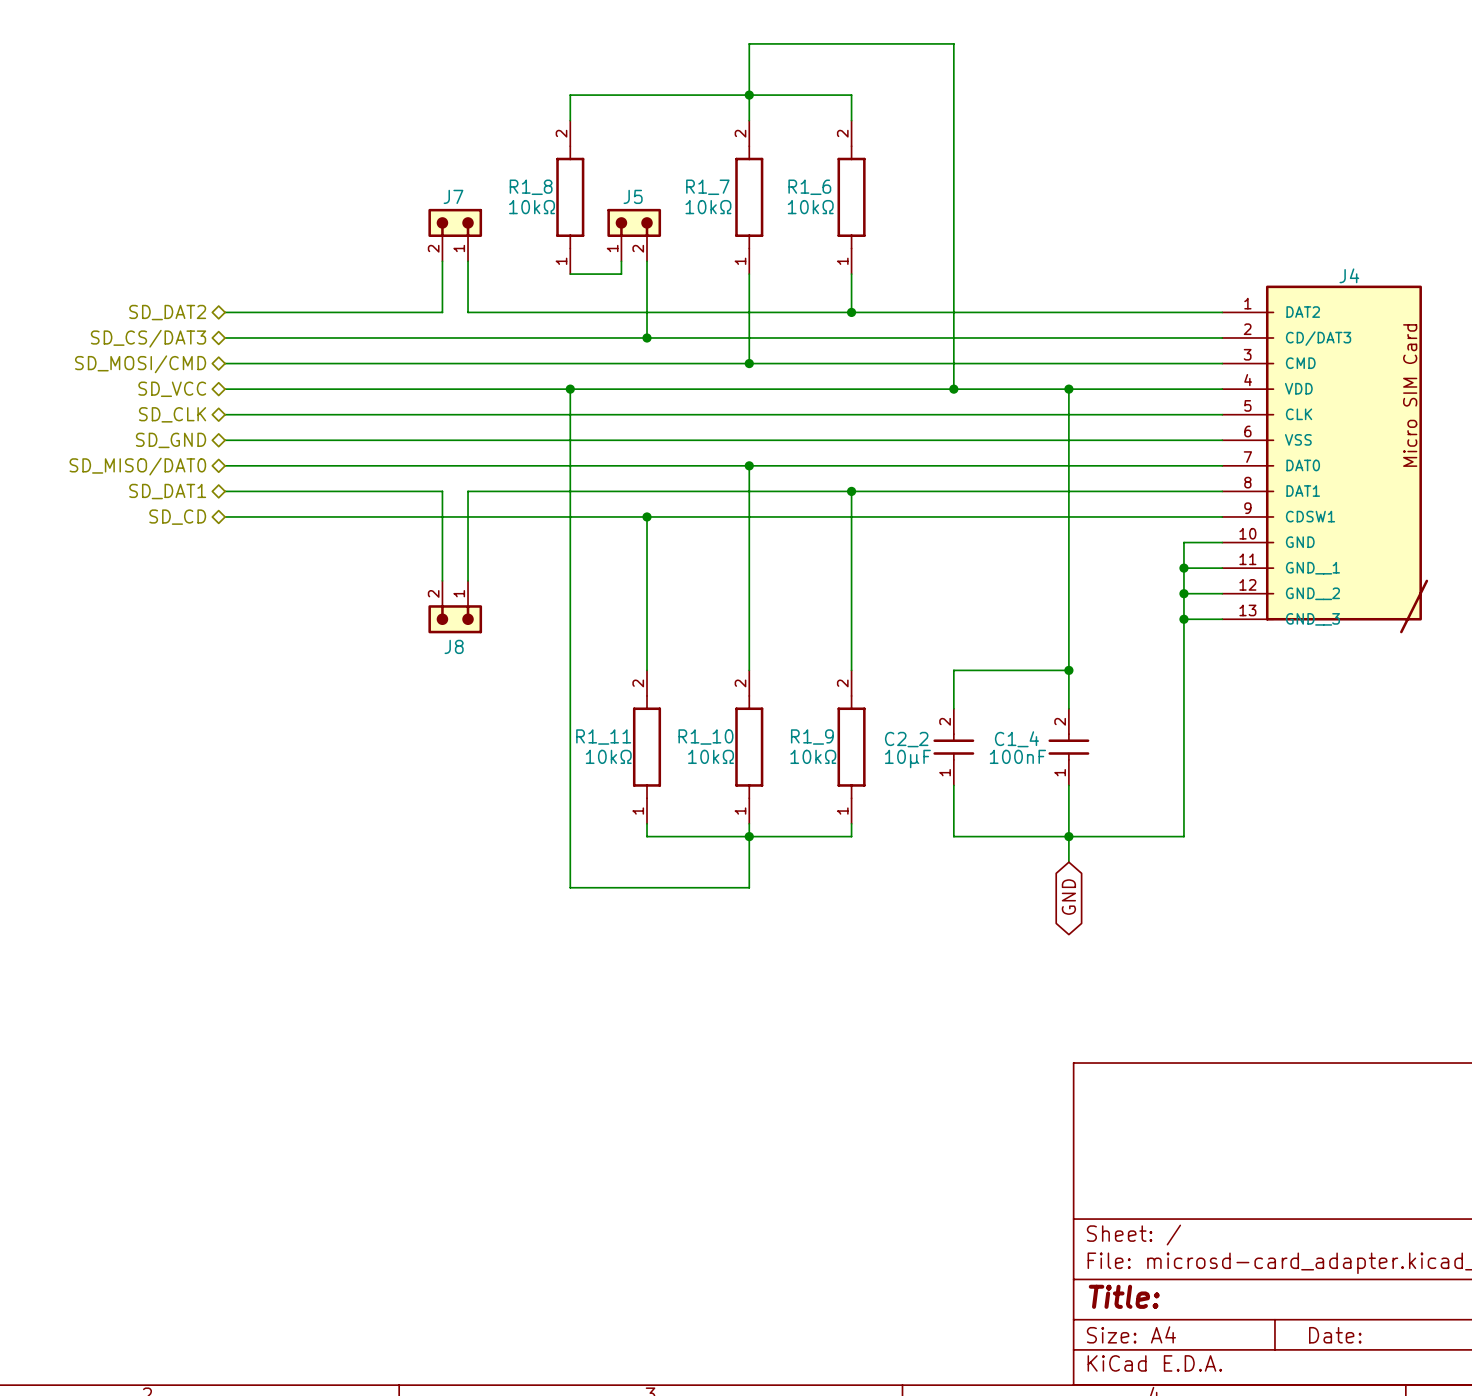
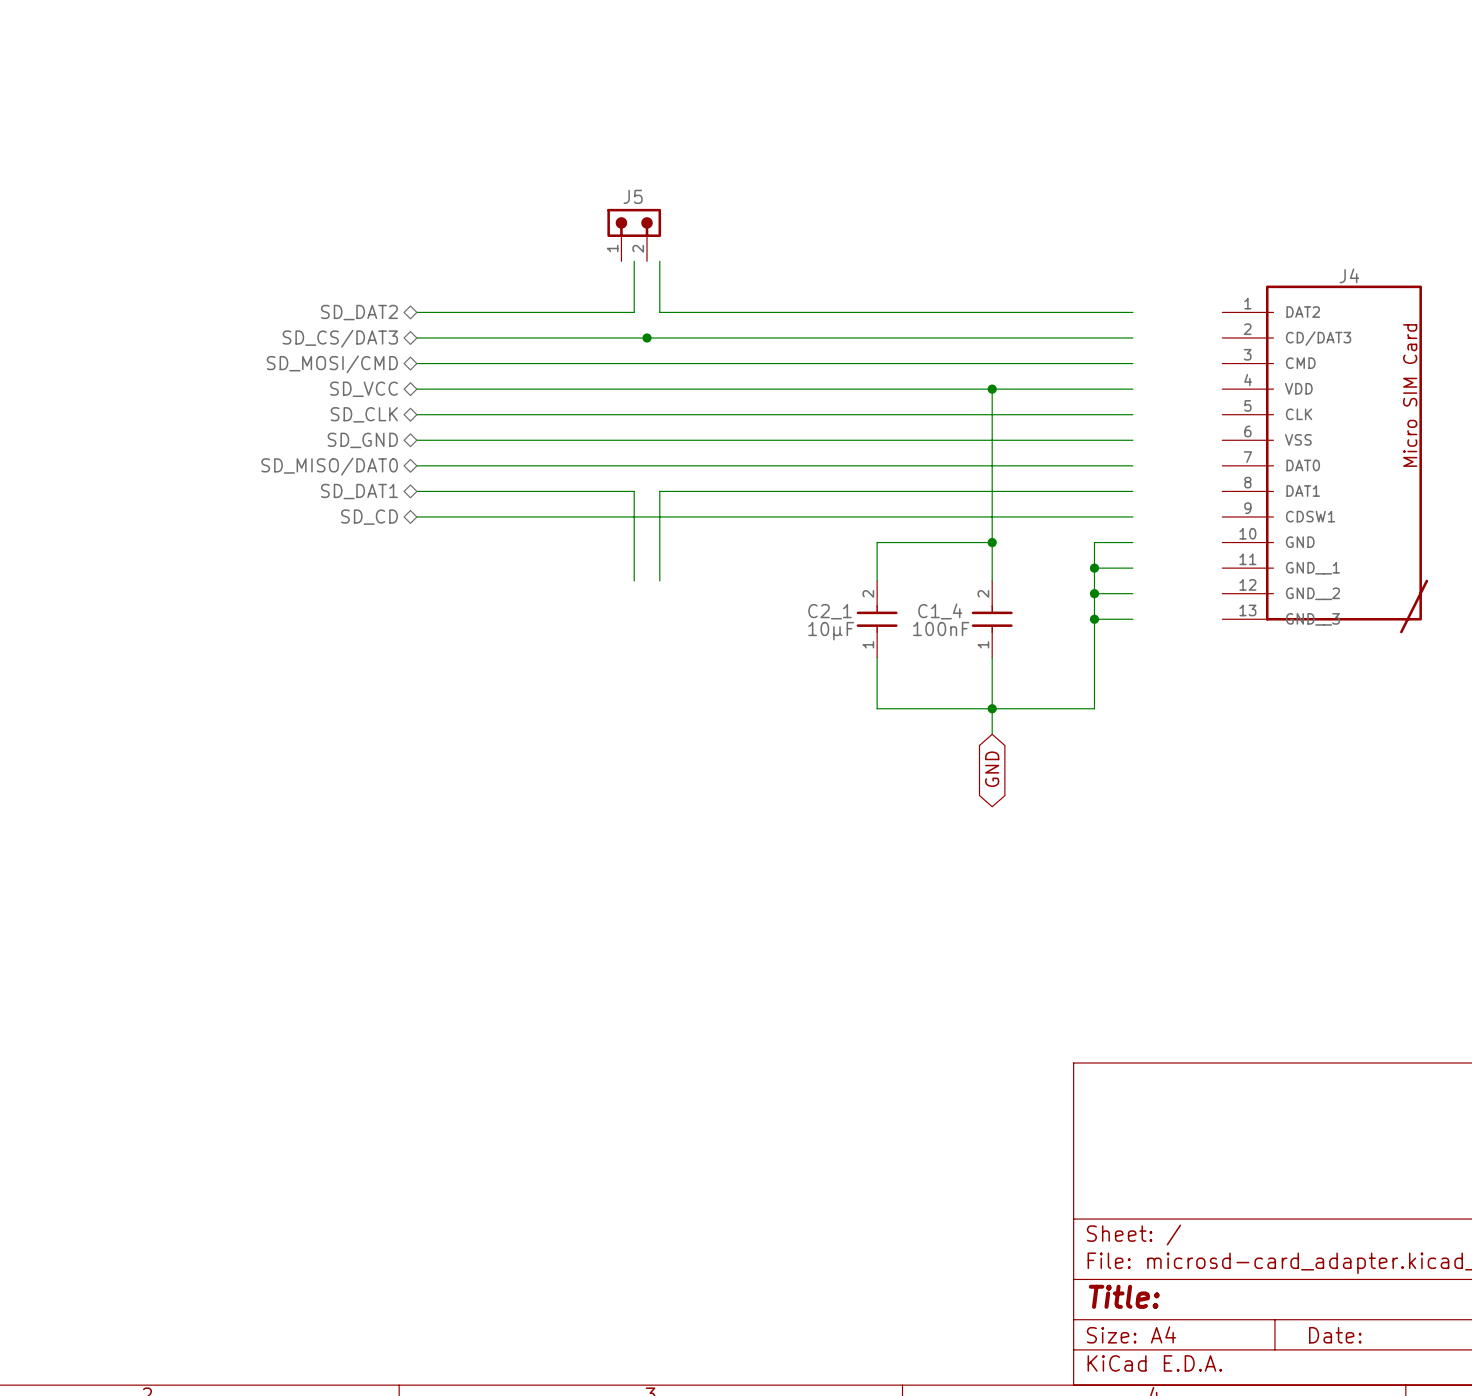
junction: (749, 95) -> none
wire: (570, 120) (570, 95) (851, 95) (851, 120) -> none
wire: (749, 120) (749, 43) (953, 43) (953, 389) -> none
R1_8: 10kΩ (570, 197) -> none
R1_7: 10kΩ (749, 197) -> none
R1_6: 10kΩ (851, 197) -> none
J7: (455, 235) -> none
wire: (442, 261) (442, 312) -> (468, 312) (442, 312)
wire: (468, 261) (468, 312) -> (659, 261) (659, 312)
wire: (621, 261) (621, 274) (570, 274) -> none
wire: (647, 261) (647, 337) -> none
wire: (749, 274) (749, 363) -> none
wire: (851, 274) (851, 312) -> none
hierarchical label position: SD_DAT2 (167, 312) -> SD_DAT2 (359, 312)
wire: (225, 312) (416, 312) -> none
wire: (634, 312) (659, 312) -> (634, 312) (634, 261)
junction: (851, 312) -> none
wire: (1132, 312) (1222, 312) -> none
wire: (225, 337) (416, 337) -> none
wire: (1132, 337) (1222, 337) -> none
hierarchical label position: SD_CS/DAT3 (148, 338) -> SD_CS/DAT3 (340, 338)
wire: (225, 363) (416, 363) -> none
junction: (749, 363) -> none
wire: (1132, 363) (1222, 363) -> none
hierarchical label position: SD_MOSI/CMD (140, 364) -> SD_MOSI/CMD (332, 364)
hierarchical label position: SD_VCC (172, 389) -> SD_VCC (364, 389)
wire: (225, 389) (416, 389) -> none
wire: (570, 389) (570, 887) (749, 887) (749, 823) -> none
junction: (570, 389) -> none
junction: (953, 389) -> none
wire: none -> (992, 389) (992, 580)
junction: none -> (992, 389)
wire: (1068, 389) (1068, 708) -> none
junction: (1068, 389) -> none
wire: (1132, 389) (1222, 389) -> none
hierarchical label position: SD_CLK (172, 414) -> SD_CLK (364, 414)
wire: (225, 414) (416, 414) -> none
wire: (1132, 414) (1222, 414) -> none
hierarchical label position: SD_GND (171, 440) -> SD_GND (362, 440)
wire: (225, 440) (416, 440) -> none
wire: (1132, 440) (1222, 440) -> none
wire: (225, 465) (416, 465) -> none
wire: (749, 465) (749, 670) -> none
junction: (749, 465) -> none
wire: (1132, 465) (1222, 465) -> none
hierarchical label position: SD_MISO/DAT0 (137, 466) -> SD_MISO/DAT0 (329, 466)
hierarchical label position: SD_DAT1 (167, 491) -> SD_DAT1 (359, 491)
wire: (225, 491) (416, 491) -> none
wire: (442, 491) (442, 580) -> (442, 491) (468, 491)
wire: (468, 491) (468, 580) -> (659, 491) (659, 580)
wire: (634, 491) (659, 491) -> (634, 491) (634, 580)
wire: (851, 491) (851, 670) -> none
junction: (851, 491) -> none
wire: (1132, 491) (1222, 491) -> none
wire: (225, 516) (416, 516) -> none
wire: (647, 516) (647, 670) -> none
junction: (647, 516) -> none
wire: (1132, 516) (1222, 516) -> none
hierarchical label position: SD_CD (177, 517) -> SD_CD (369, 517)
junction: none -> (992, 542)
wire: none -> (1132, 542) (1094, 542) (1094, 708) (877, 708) (877, 657)
wire: (1222, 542) (1183, 542) (1183, 836) (953, 836) (953, 785) -> none
junction: none -> (1094, 568)
wire: (1183, 568) (1222, 568) -> (1094, 568) (1132, 568)
junction: (1183, 568) -> none
junction: none -> (1094, 593)
wire: (1183, 593) (1222, 593) -> (1094, 593) (1132, 593)
junction: (1183, 593) -> none
J8: (455, 607) -> none
C2_1: none -> 10µF (877, 619)
junction: none -> (1094, 619)
wire: (1183, 619) (1222, 619) -> (1094, 619) (1132, 619)
junction: (1183, 619) -> none
wire: (1068, 670) (953, 670) (953, 708) -> (992, 542) (877, 542) (877, 580)
junction: (1068, 670) -> none
junction: none -> (992, 708)
R1_11: 10kΩ (647, 747) -> none
R1_10: 10kΩ (749, 747) -> none
R1_9: 10kΩ (851, 747) -> none
C2_2: 10µF (953, 747) -> none
C1_4 position: (1068, 747) -> (992, 619)
wire: (1068, 785) (1068, 862) -> (992, 657) (992, 734)
wire: (647, 823) (647, 836) (851, 836) (851, 823) -> none
junction: (749, 836) -> none
junction: (1068, 836) -> none
global label position: GND (1068, 897) -> GND (992, 769)

